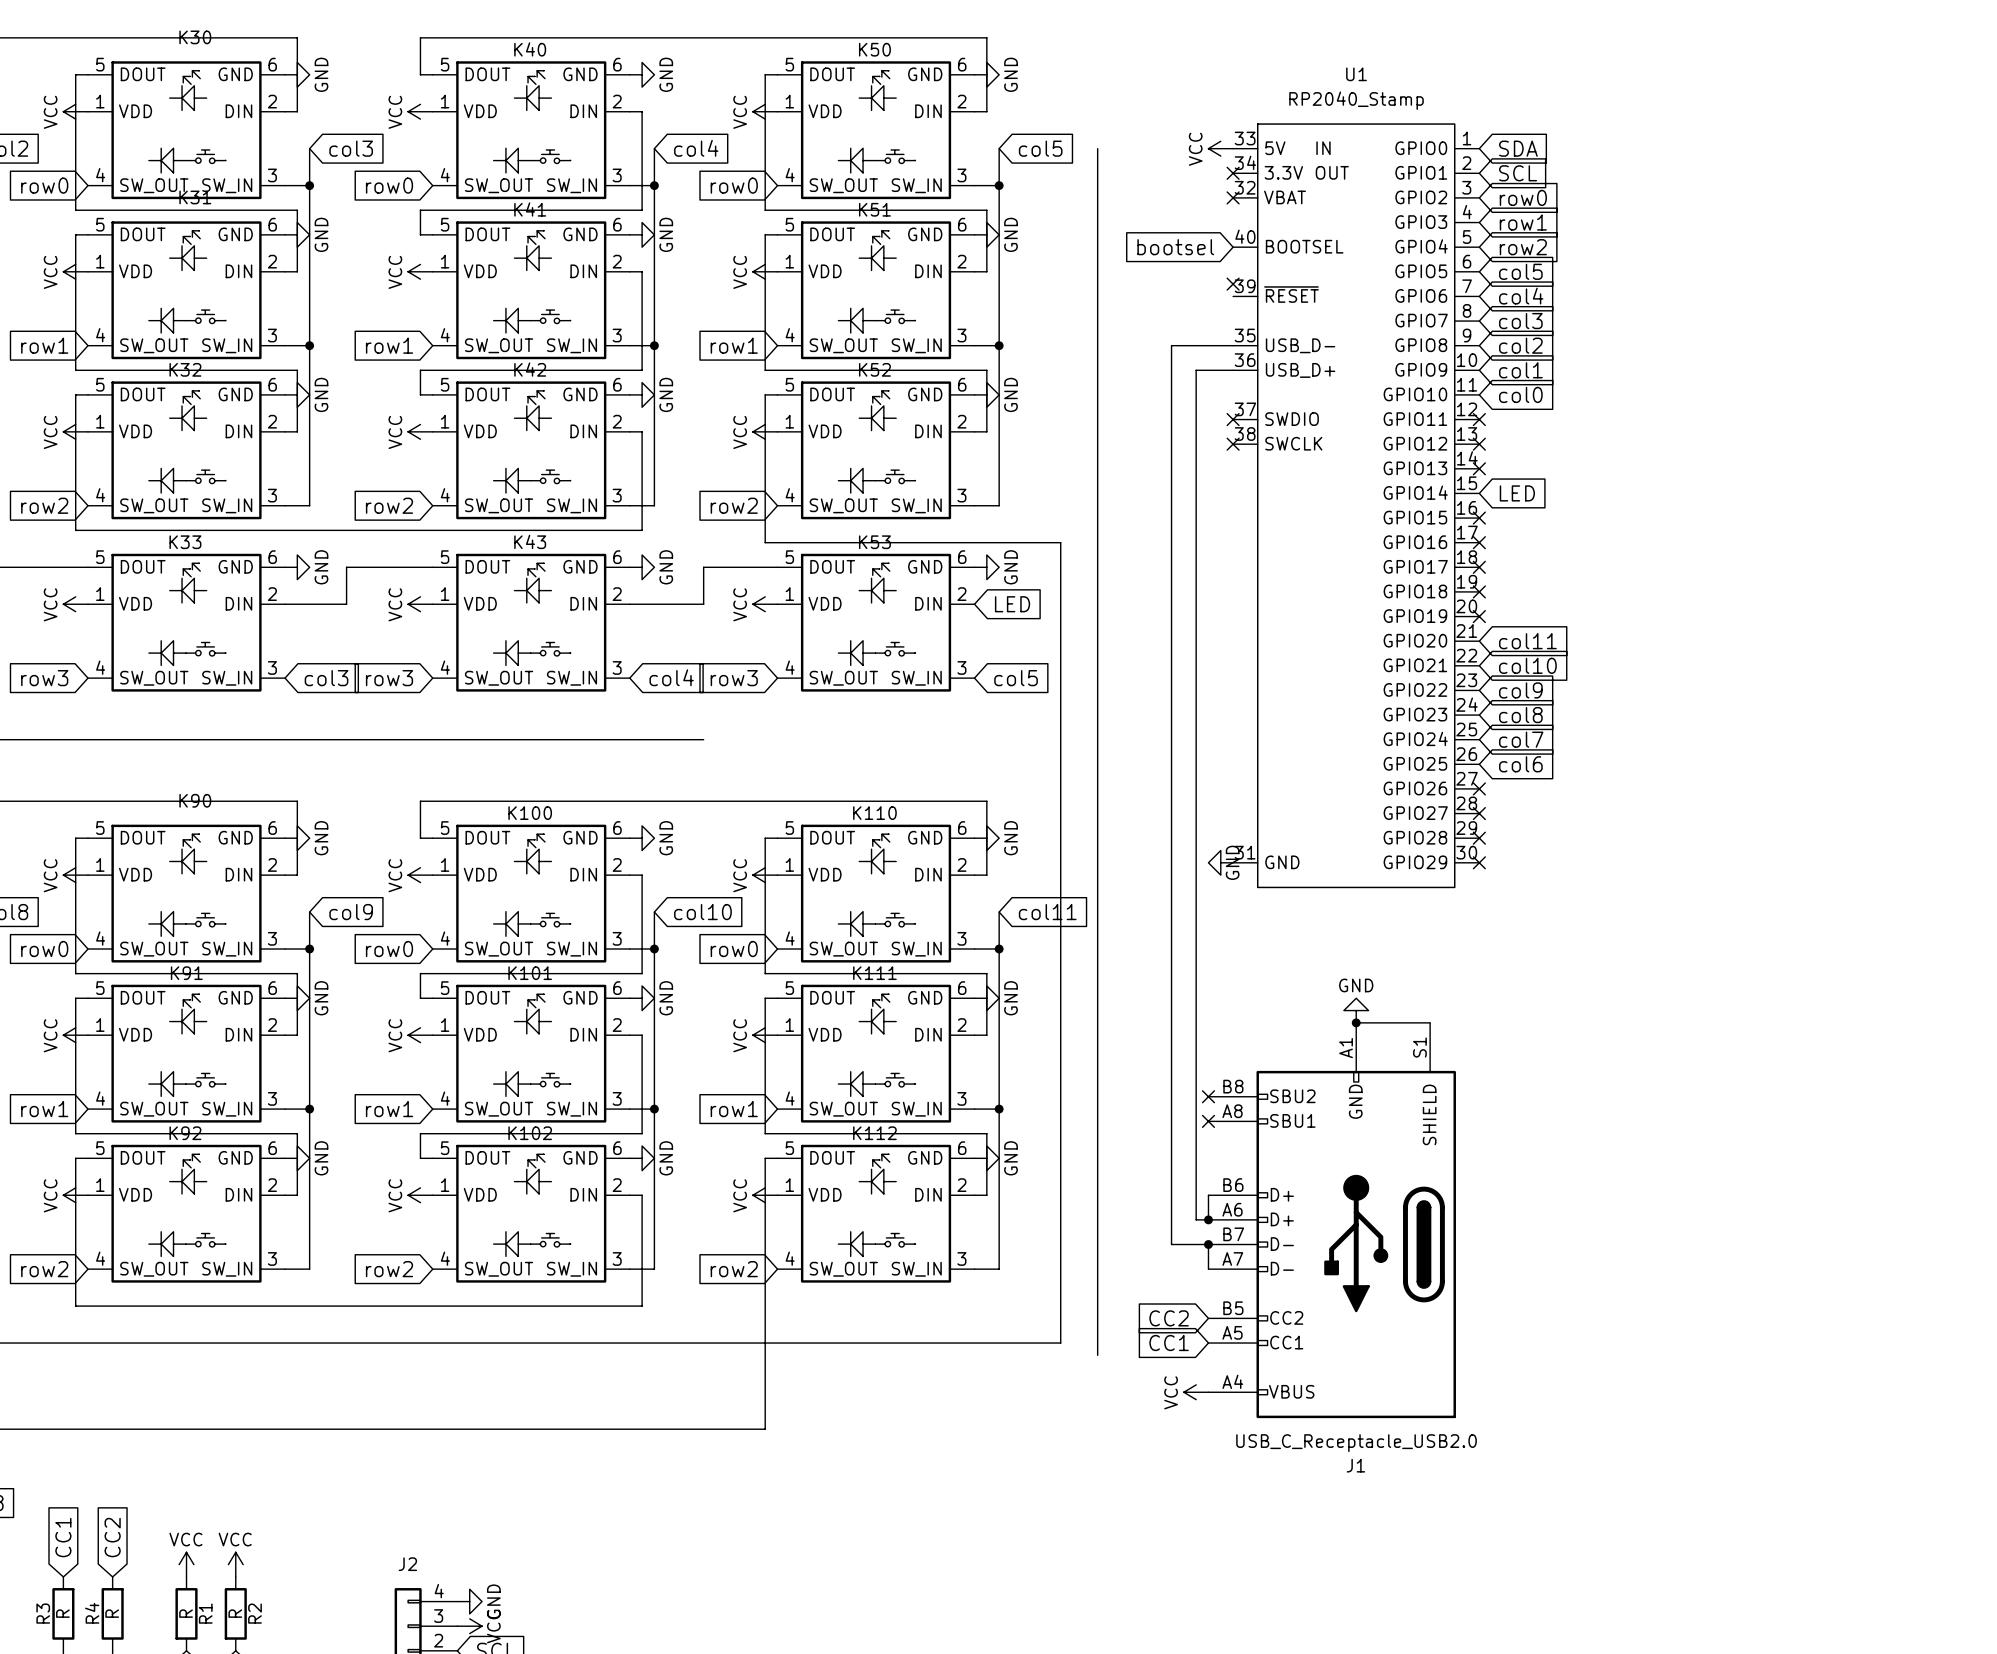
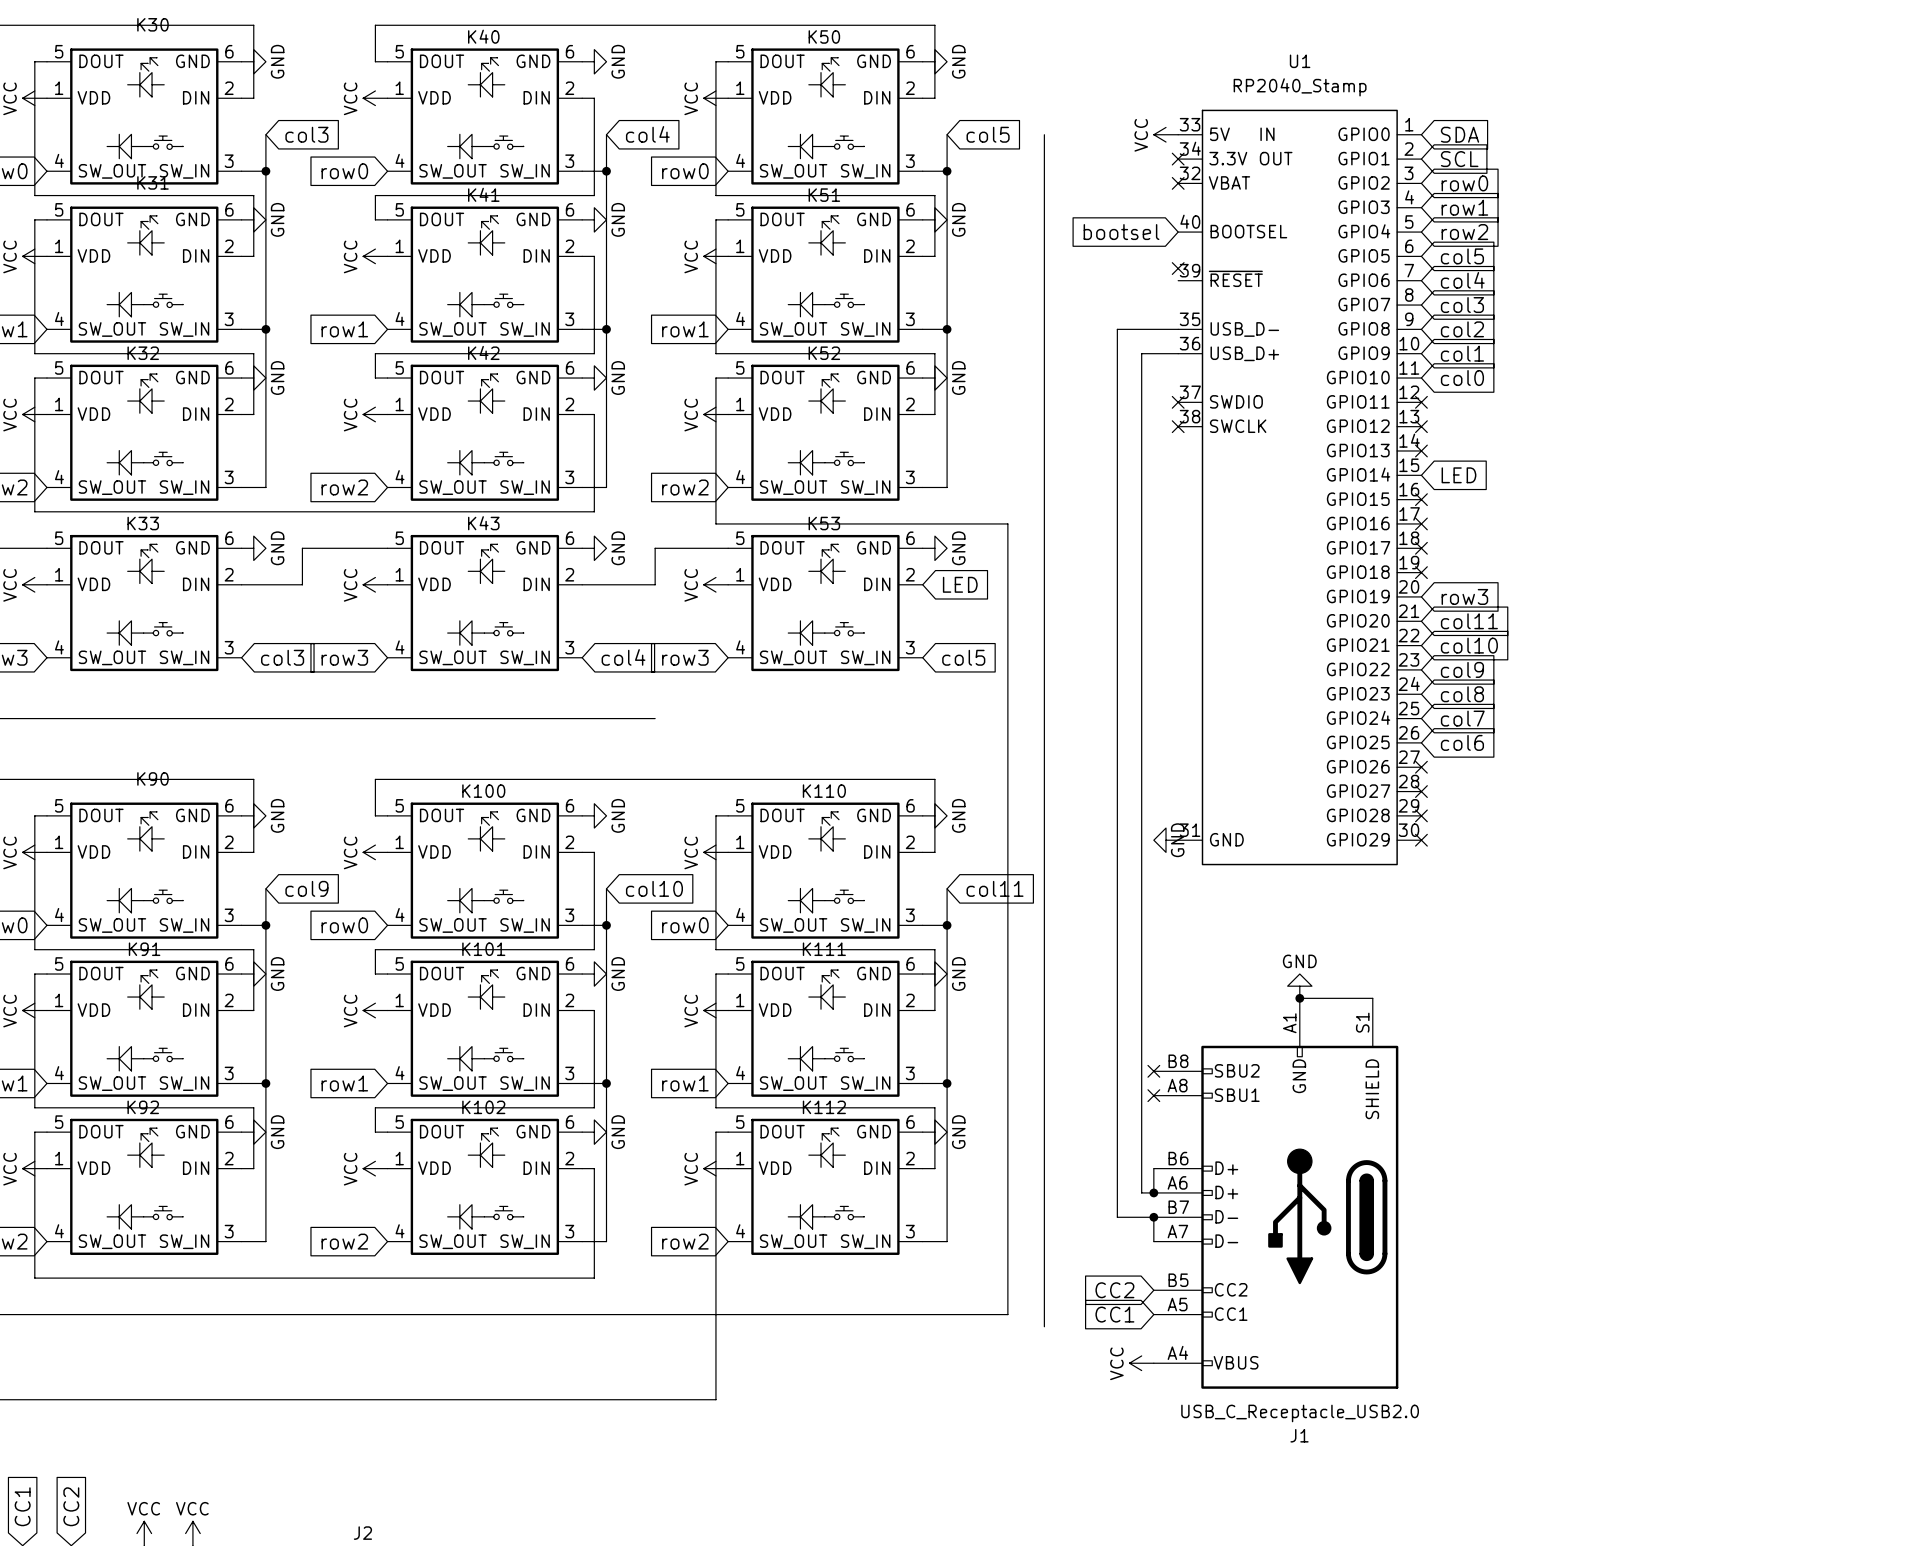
no-connect mark: (1479, 616) -> none
global label: none -> row3 (1464, 596)

